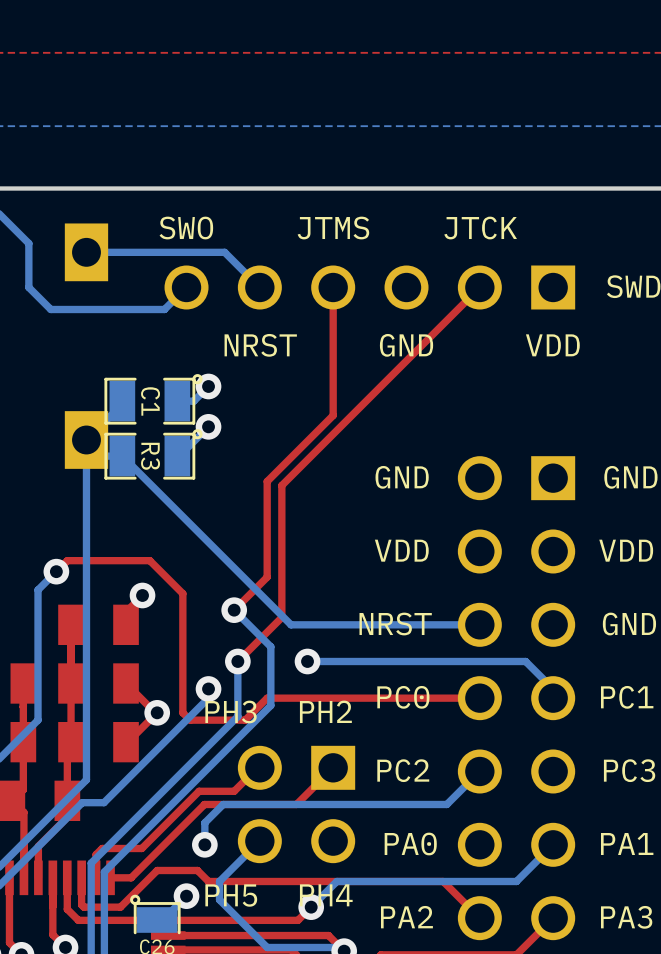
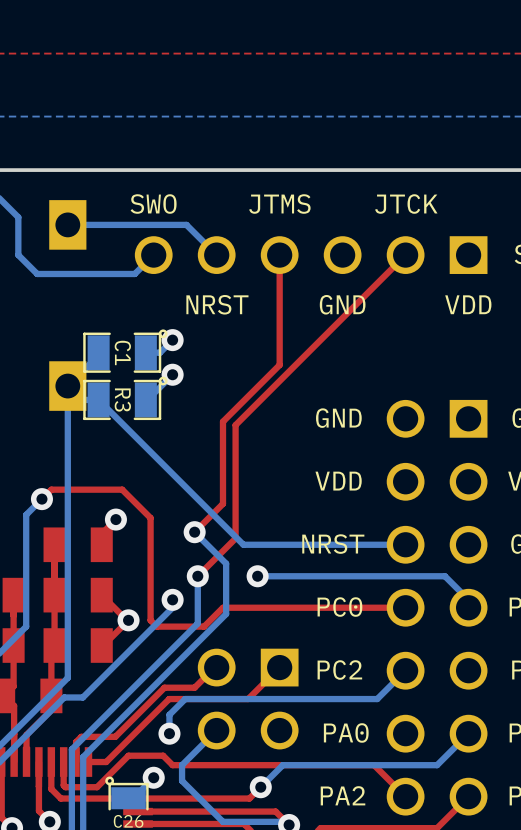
text: PH3 PH2 (278, 712) -> none
text: PH5 PH4 (279, 895) -> none

